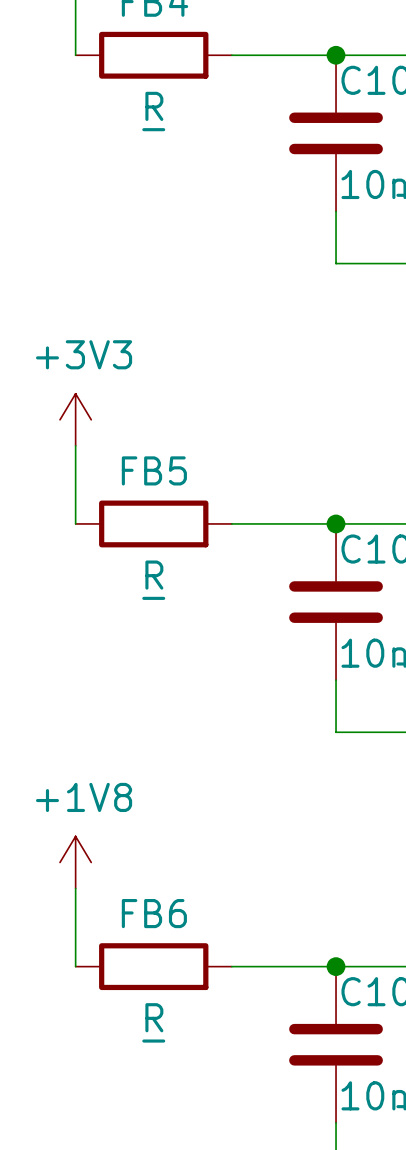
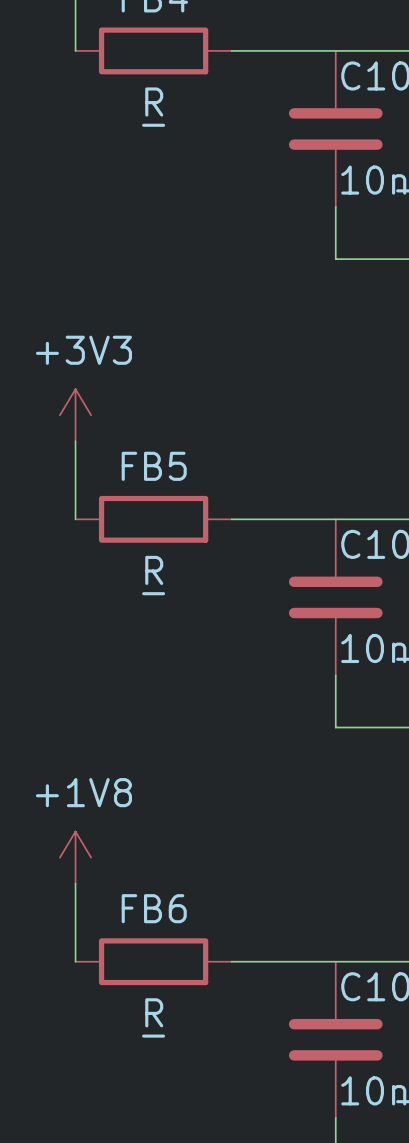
junction: (336, 55) -> none
junction: (336, 523) -> none
junction: (336, 966) -> none

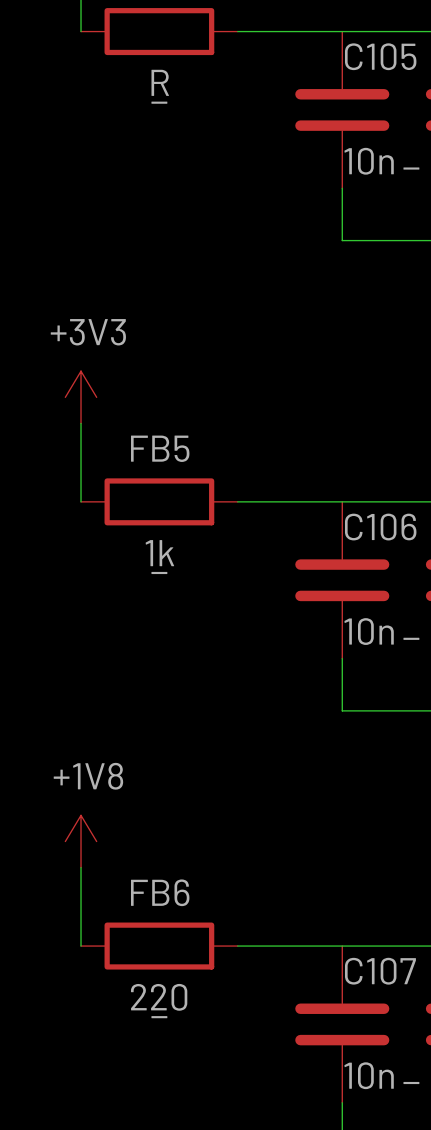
FB5 value: R (154, 570) -> 1k (159, 553)
FB6 value: R (154, 1012) -> 220 (159, 997)

